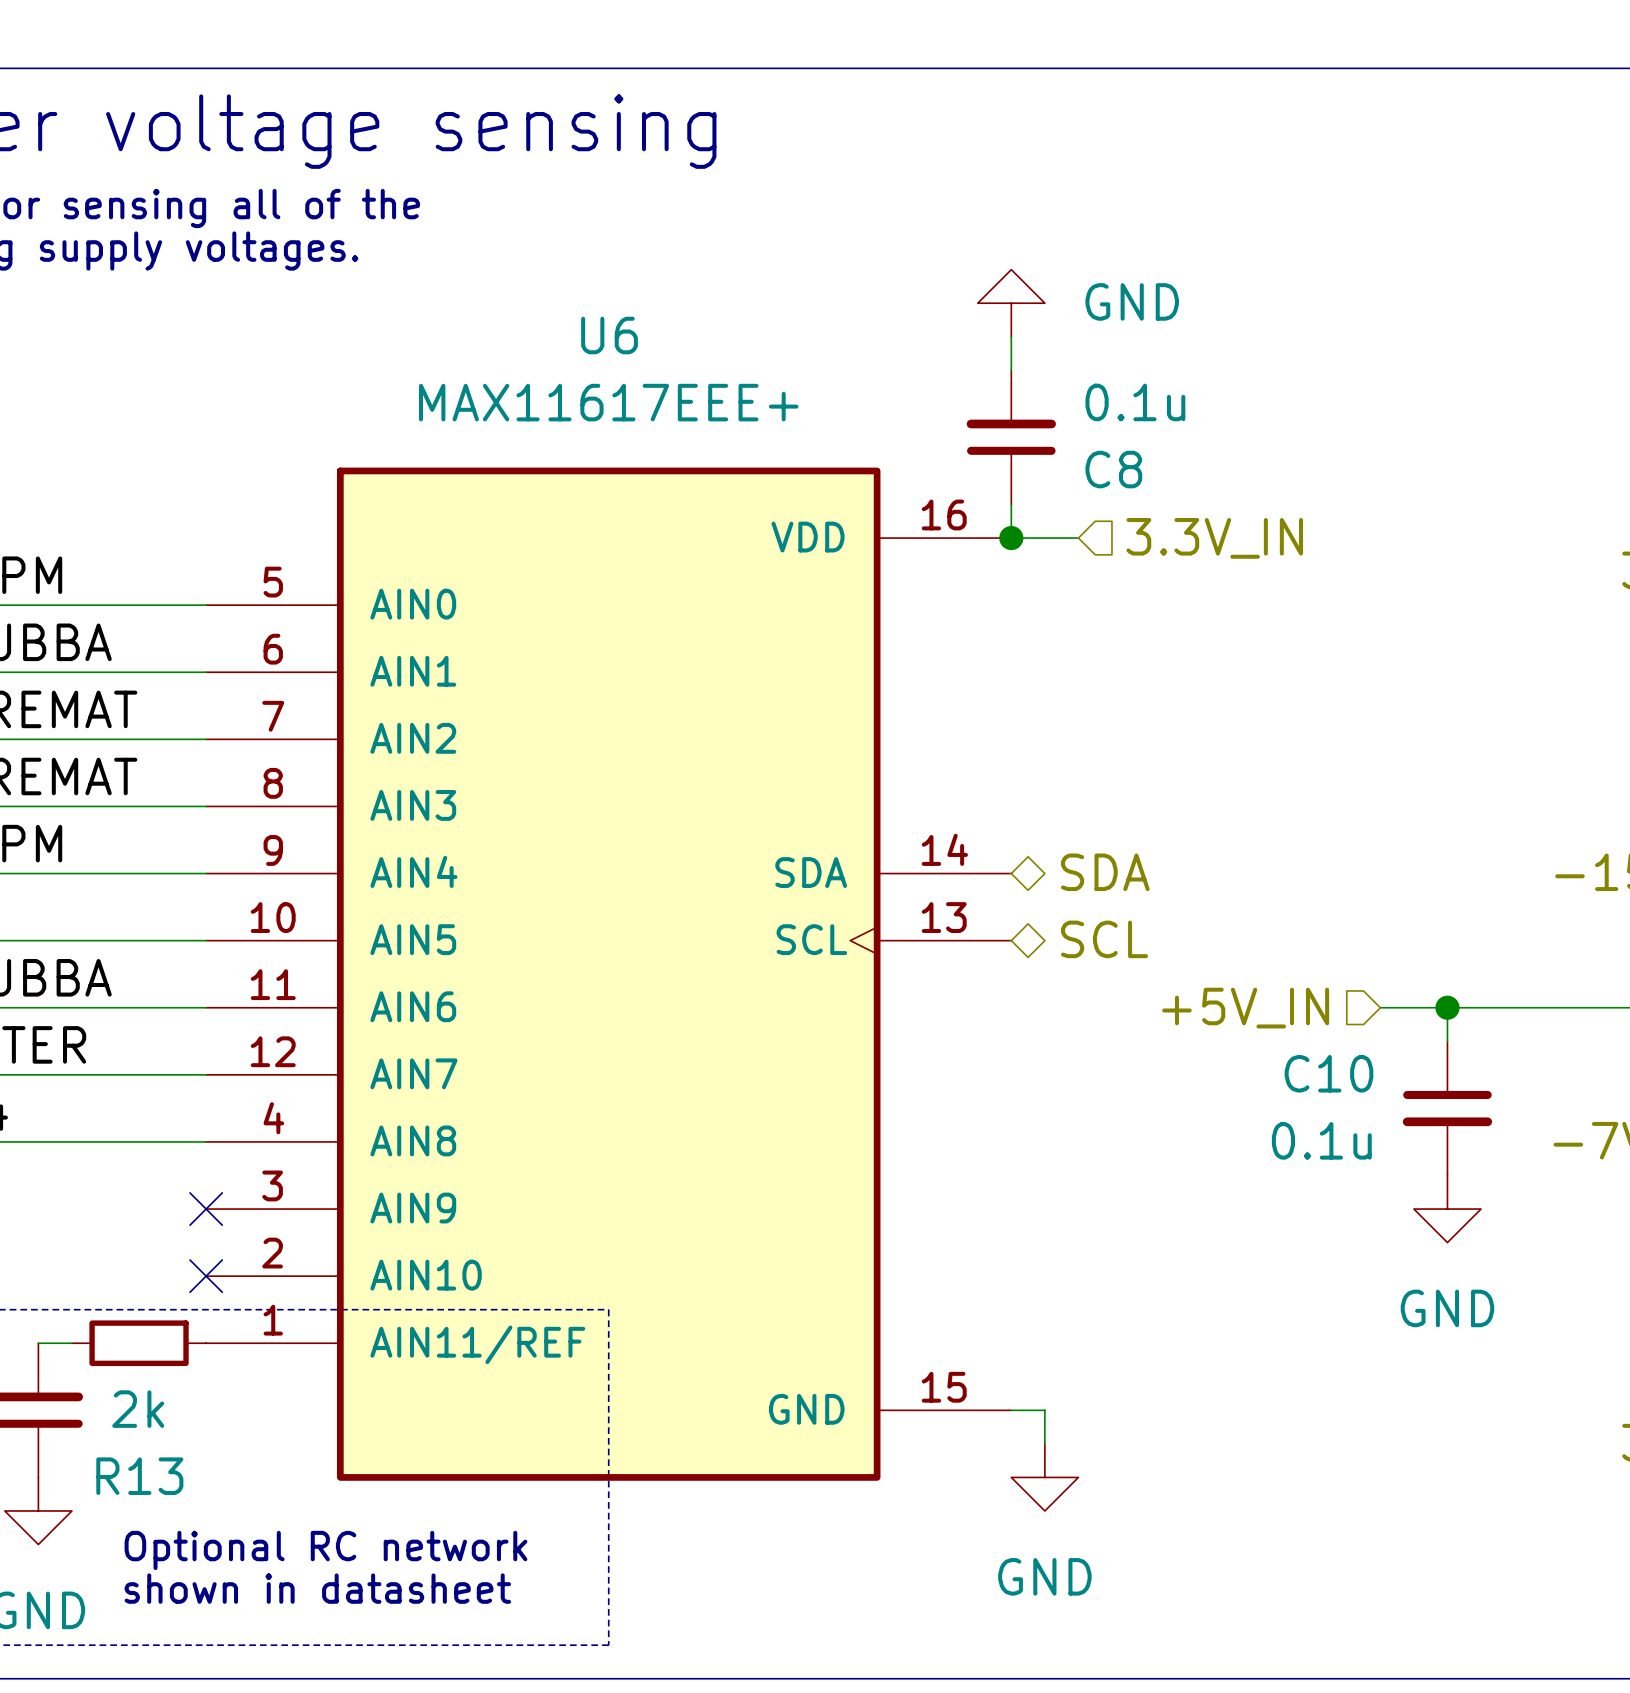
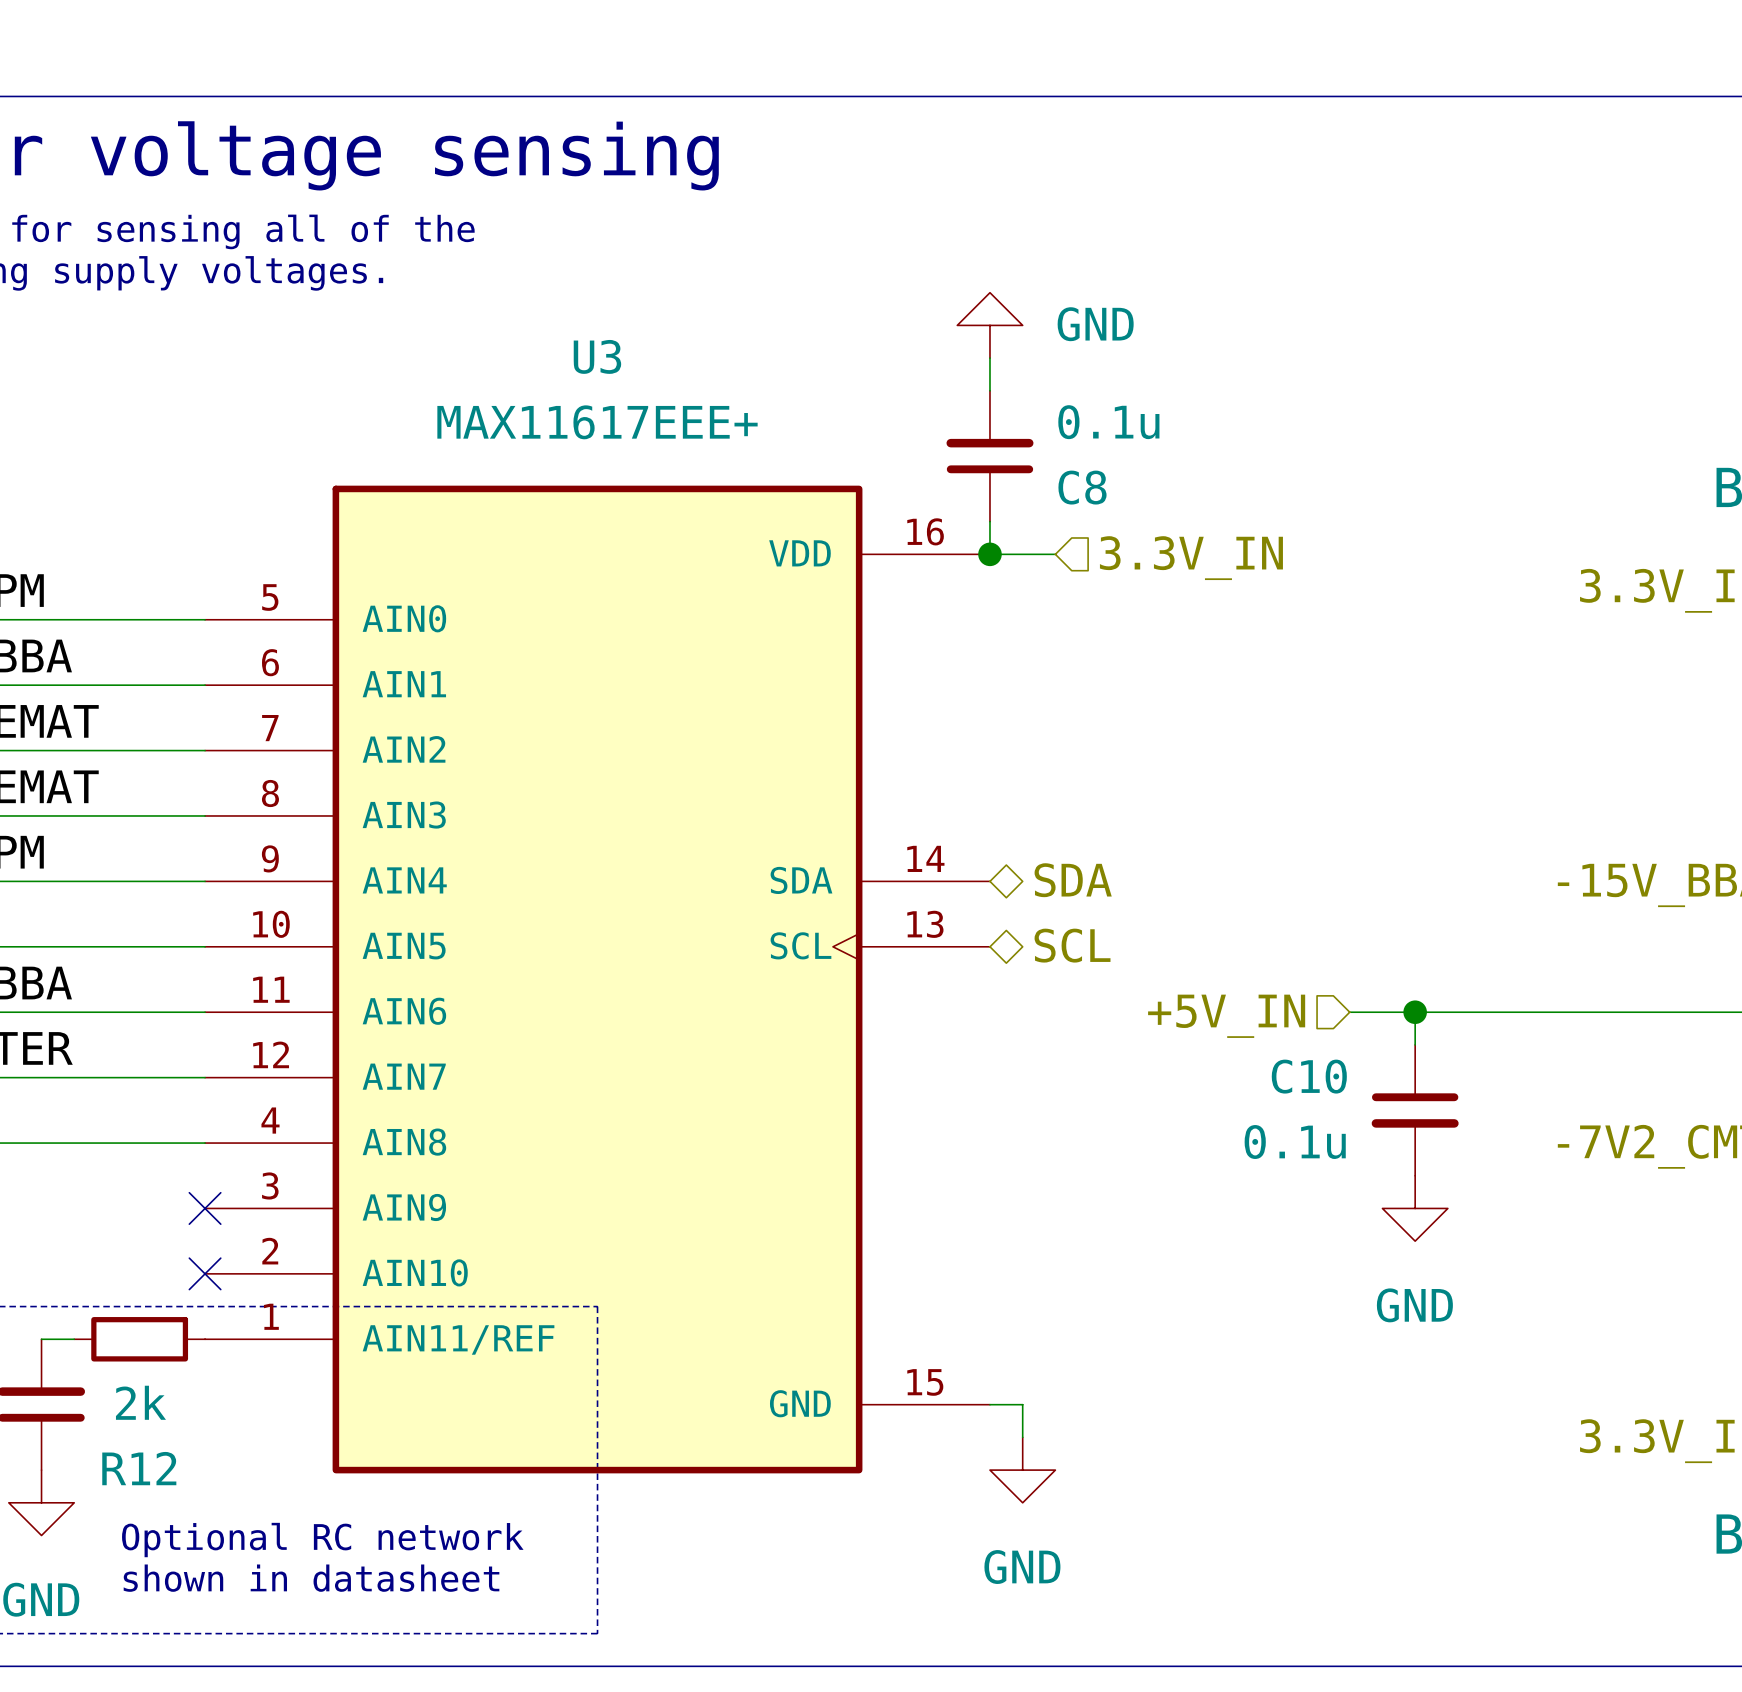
U6 name: U6 (609, 335) -> U3 (597, 356)
R13 name: R13 (139, 1476) -> R12 (139, 1468)

